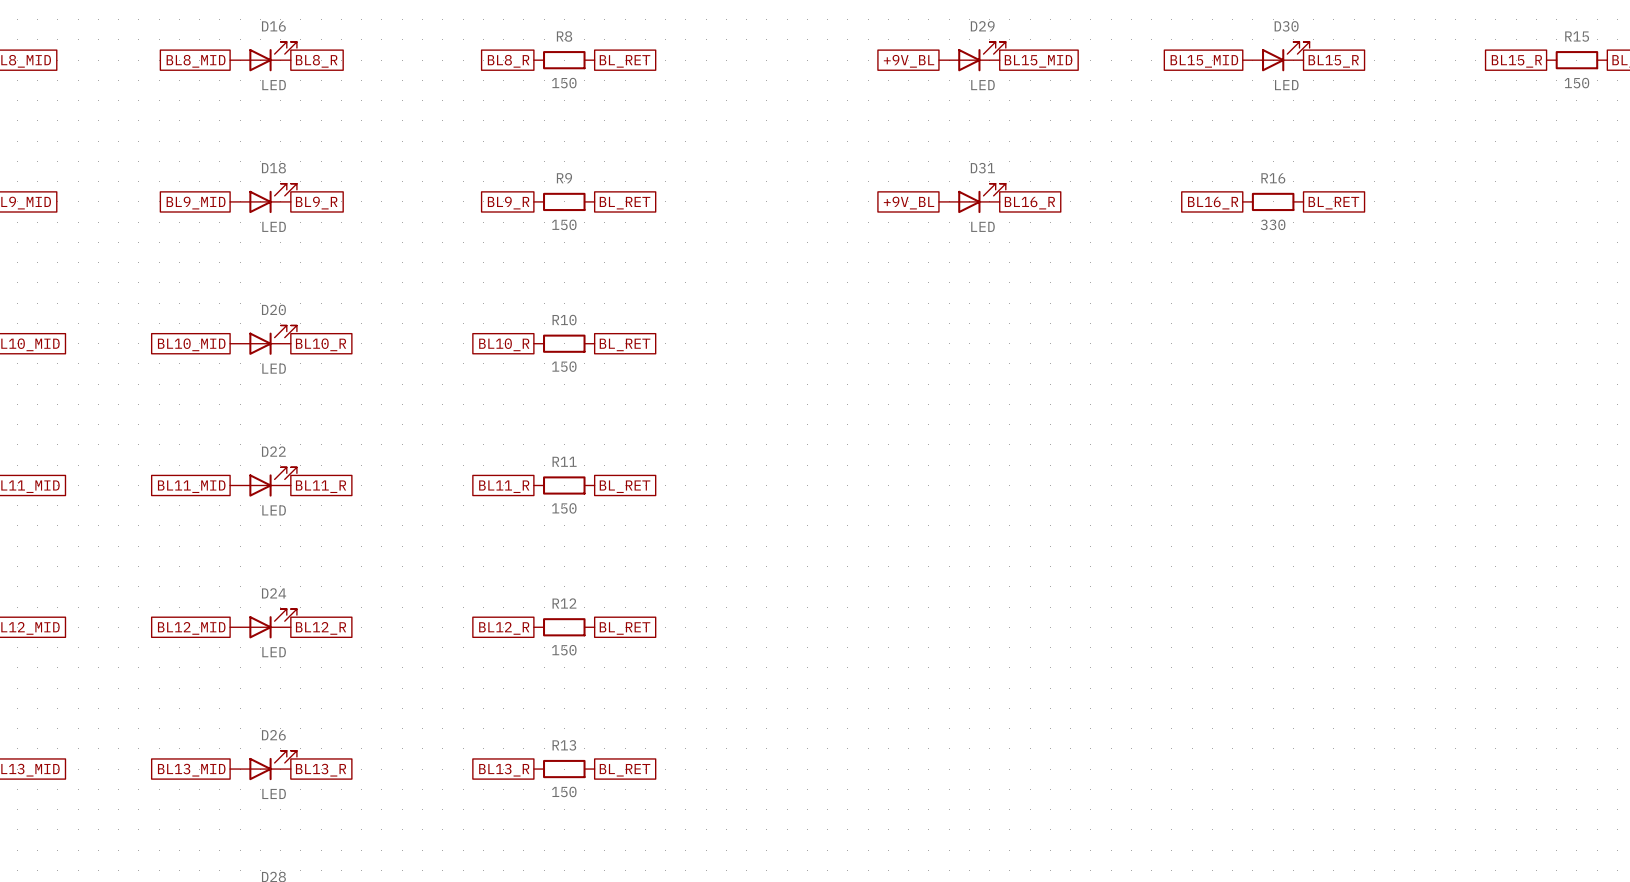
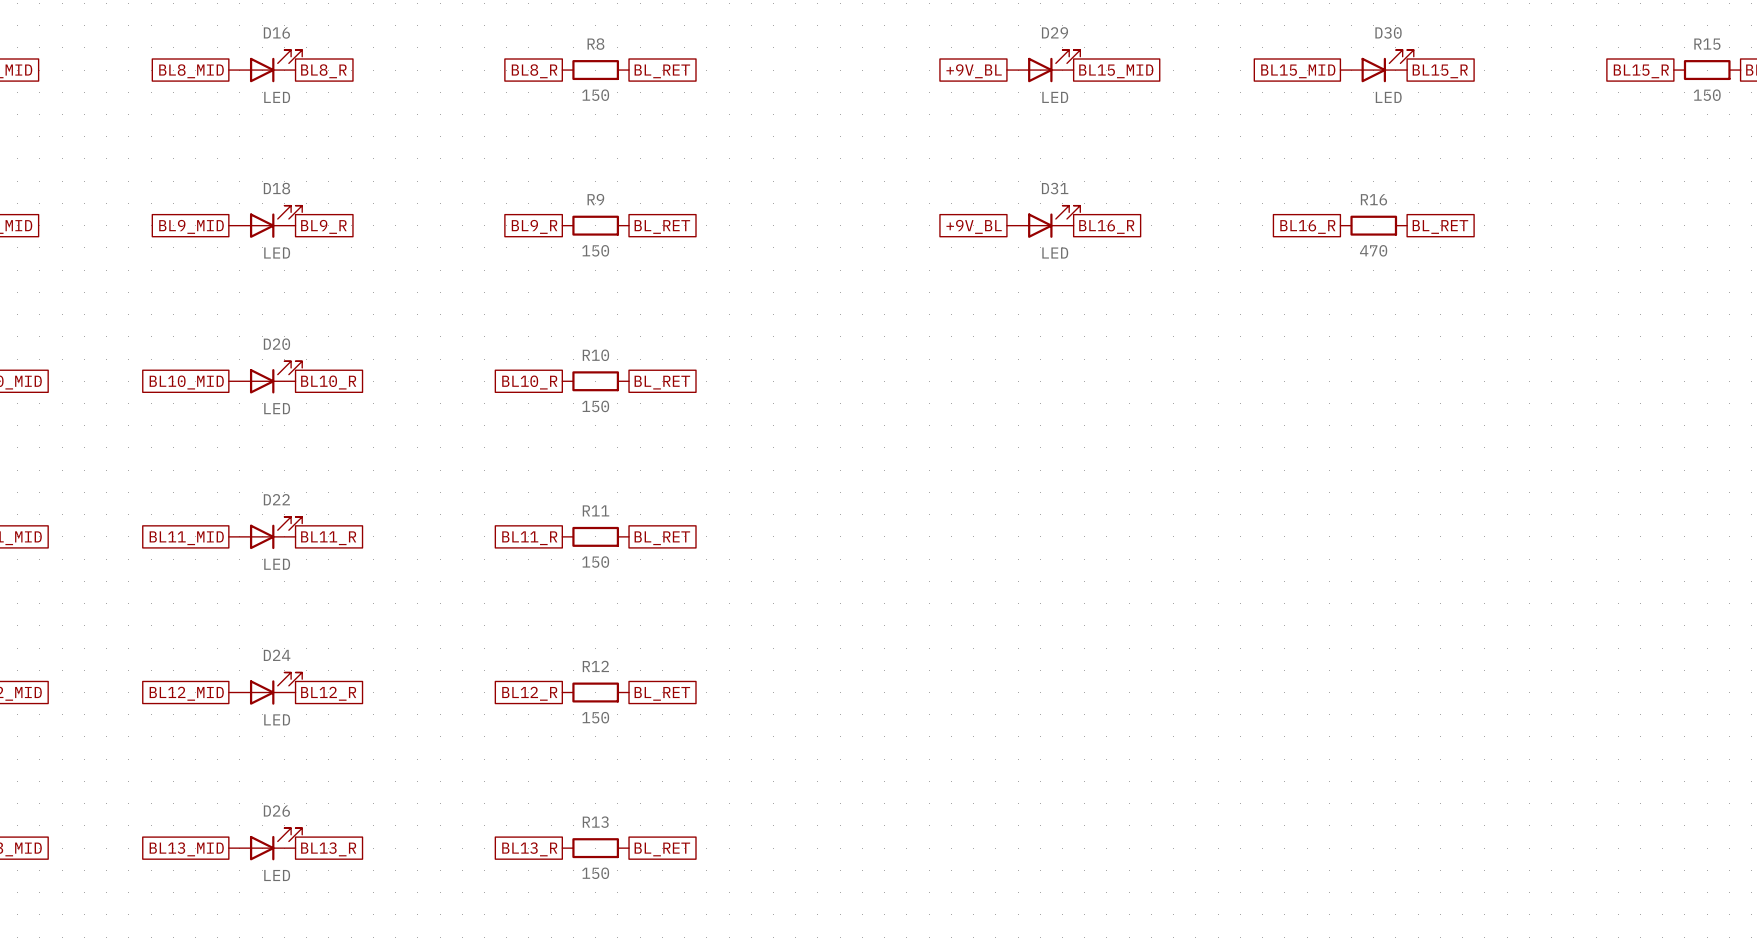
R16 value: 330 (1273, 224) -> 470 (1373, 250)

